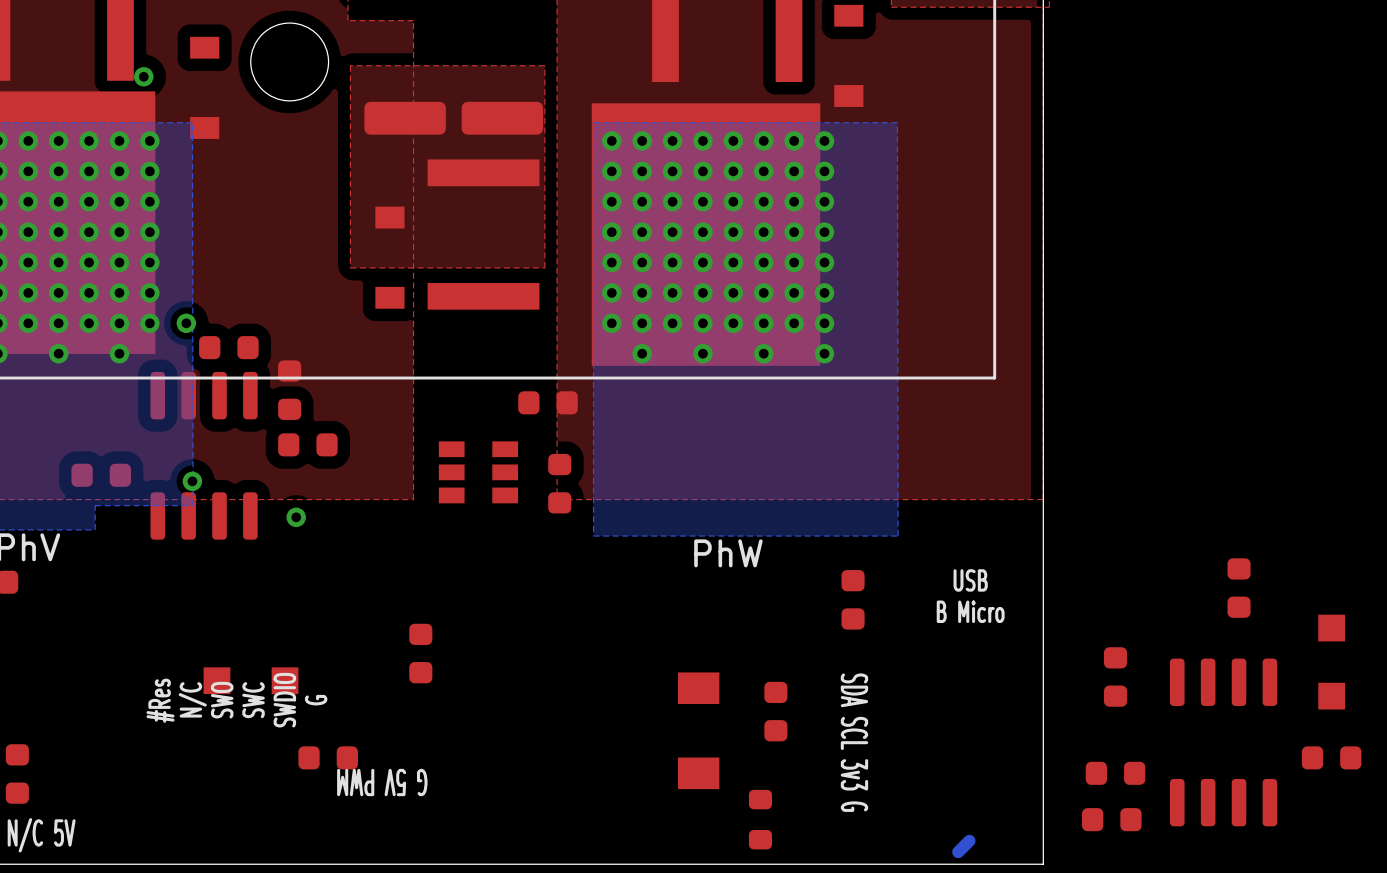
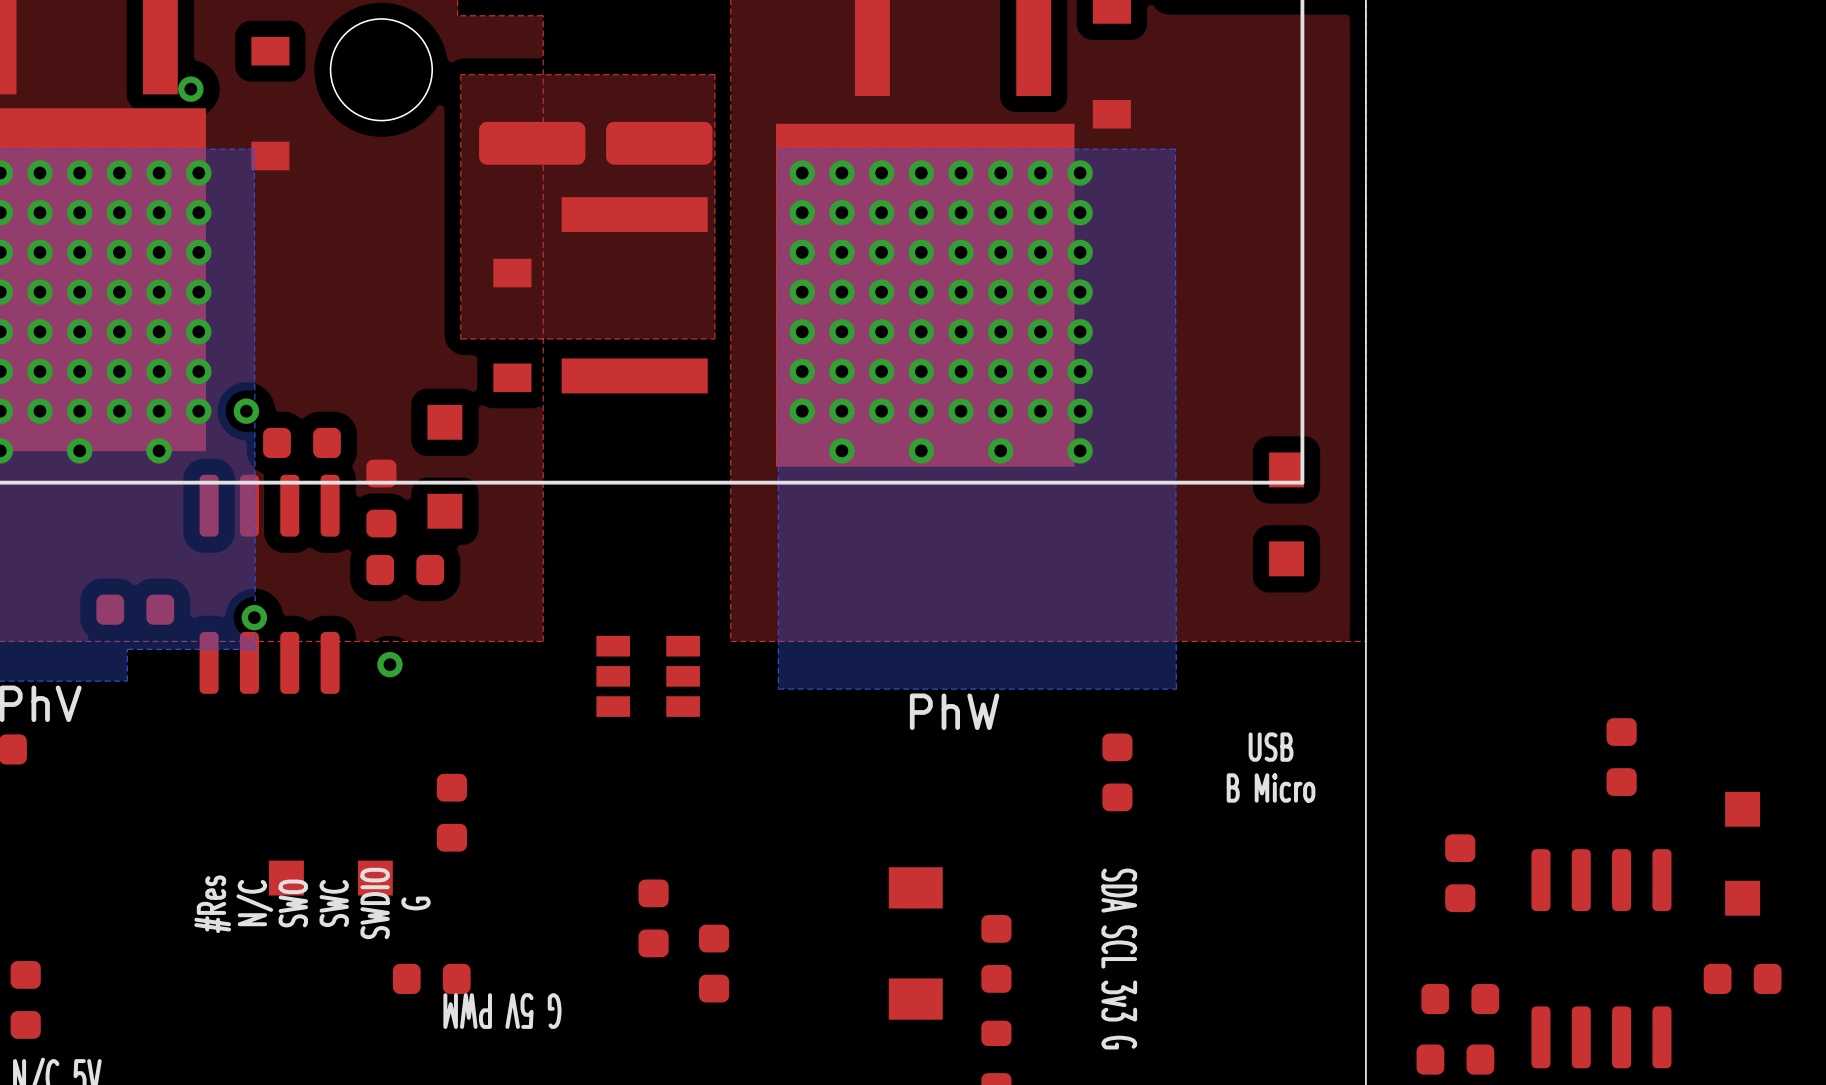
part: none -> (444, 466)
part: (548, 402) -> none
part: none -> (1286, 514)
part position: (478, 472) -> (648, 676)
part: (559, 483) -> none
part: none -> (451, 812)
part: (420, 653) -> none
part: none -> (653, 918)
part position: (775, 711) -> (996, 953)
part: none -> (714, 963)

